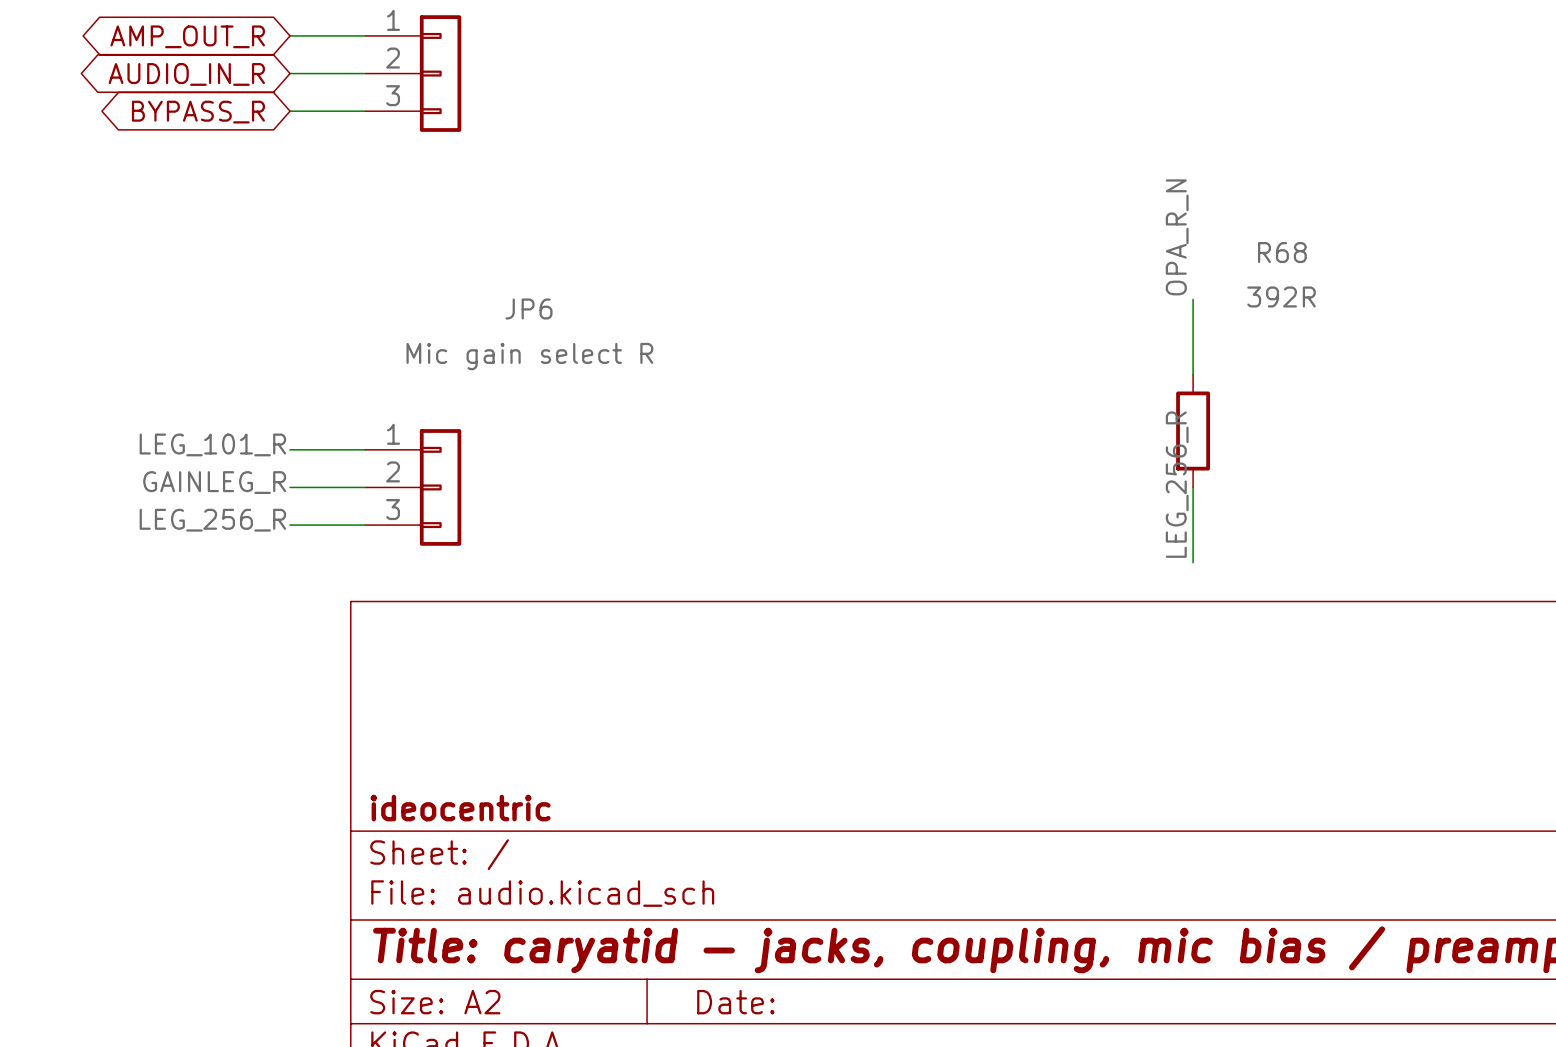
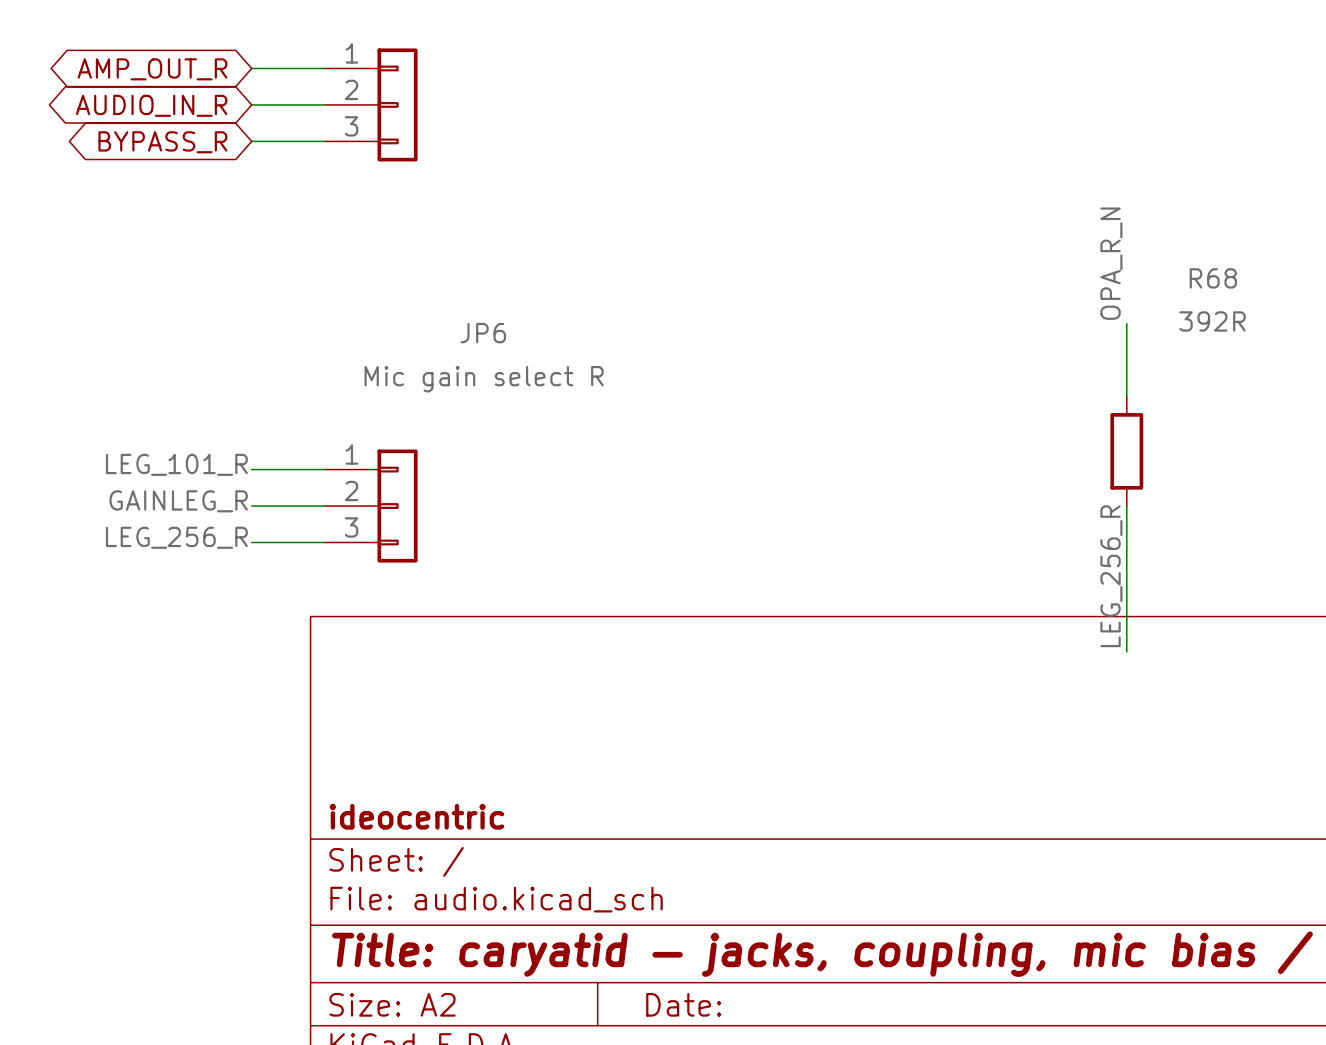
label position: LEG_256_R (1177, 484) -> LEG_256_R (1111, 576)
wire: none -> (1126, 578) (1126, 651)

